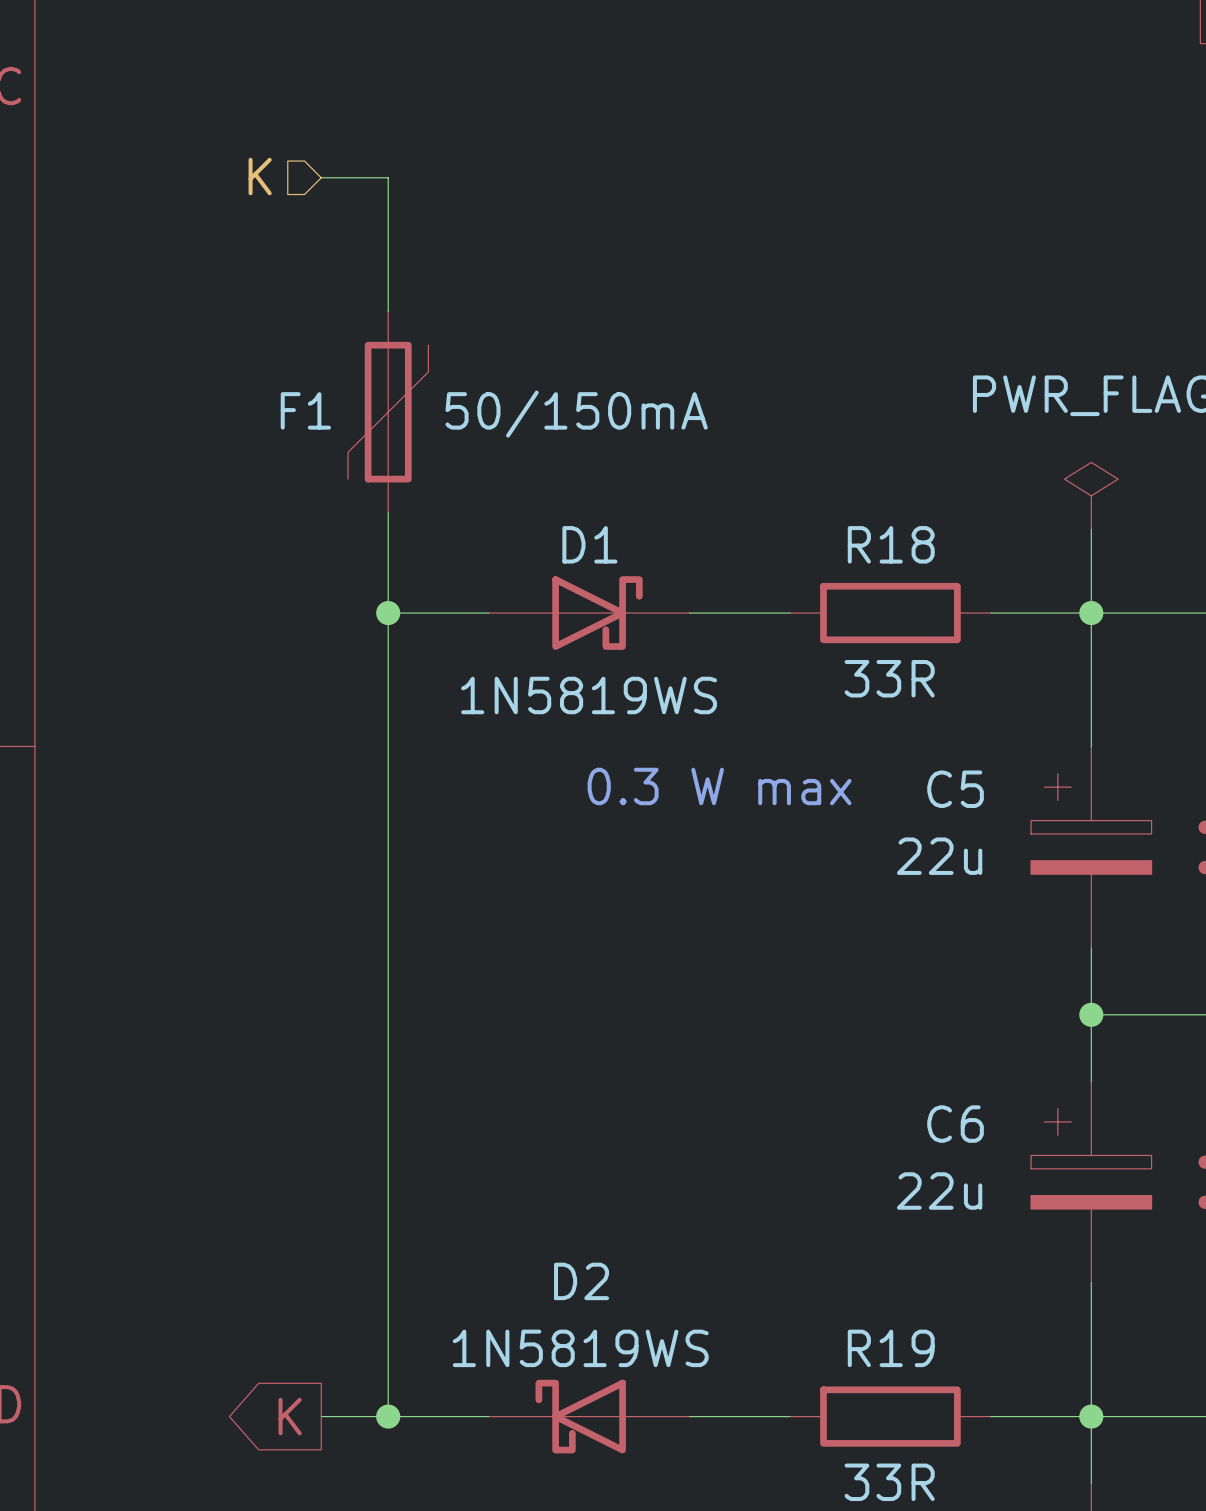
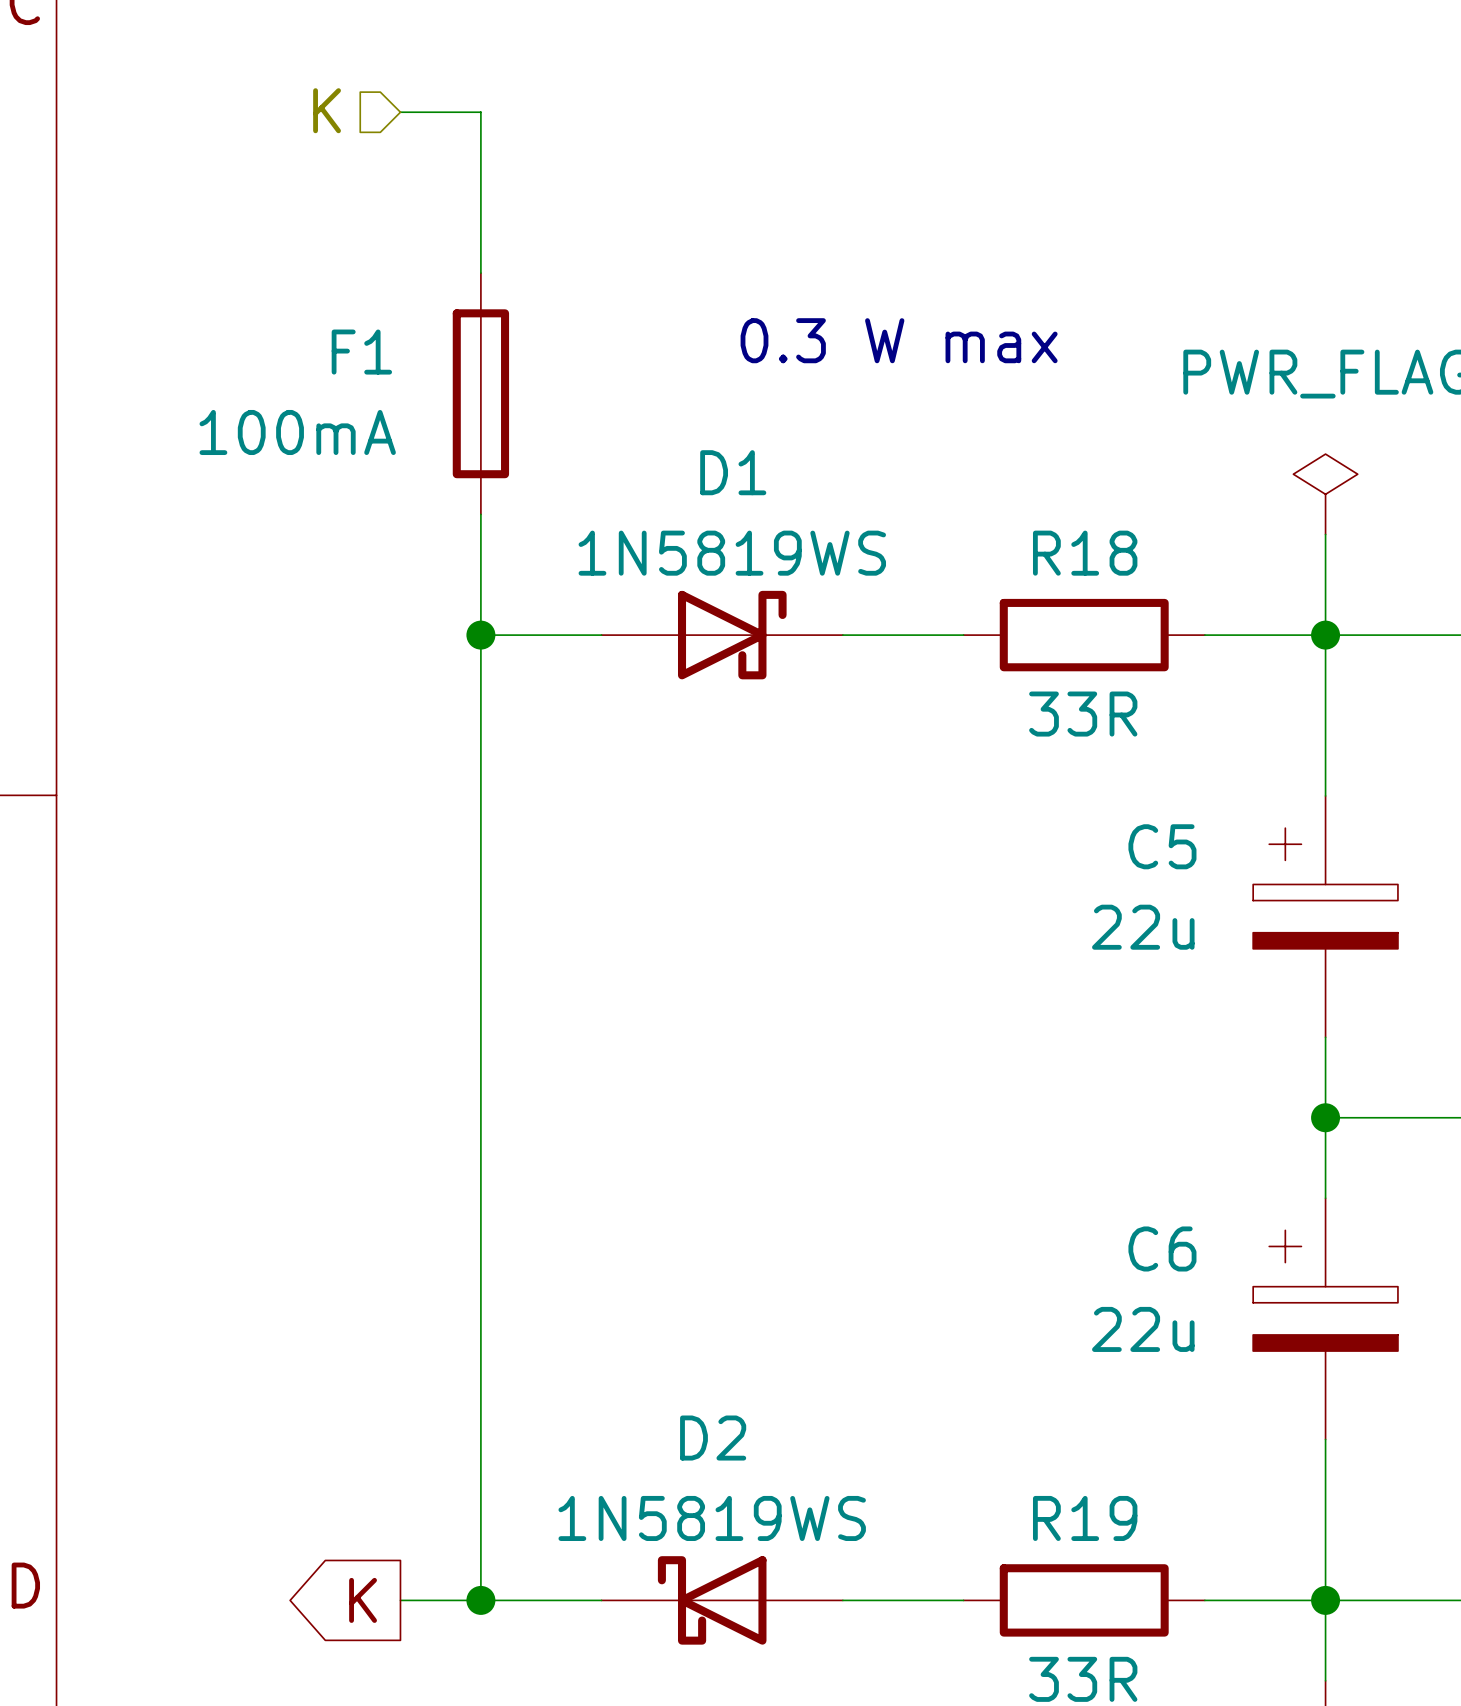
F1 symbol: [348, 311, 429, 513] -> [452, 273, 510, 515]
F1 name position: F1 (305, 410) -> F1 (361, 352)
F1 value: 50/150mA (576, 414) -> 100mA (297, 432)
D1 name position: D1 (589, 544) -> D1 (733, 472)
D1 value position: 1N5819WS (589, 695) -> 1N5819WS (732, 553)
text position: 0.3 W max (719, 786) -> 0.3 W max (899, 340)

